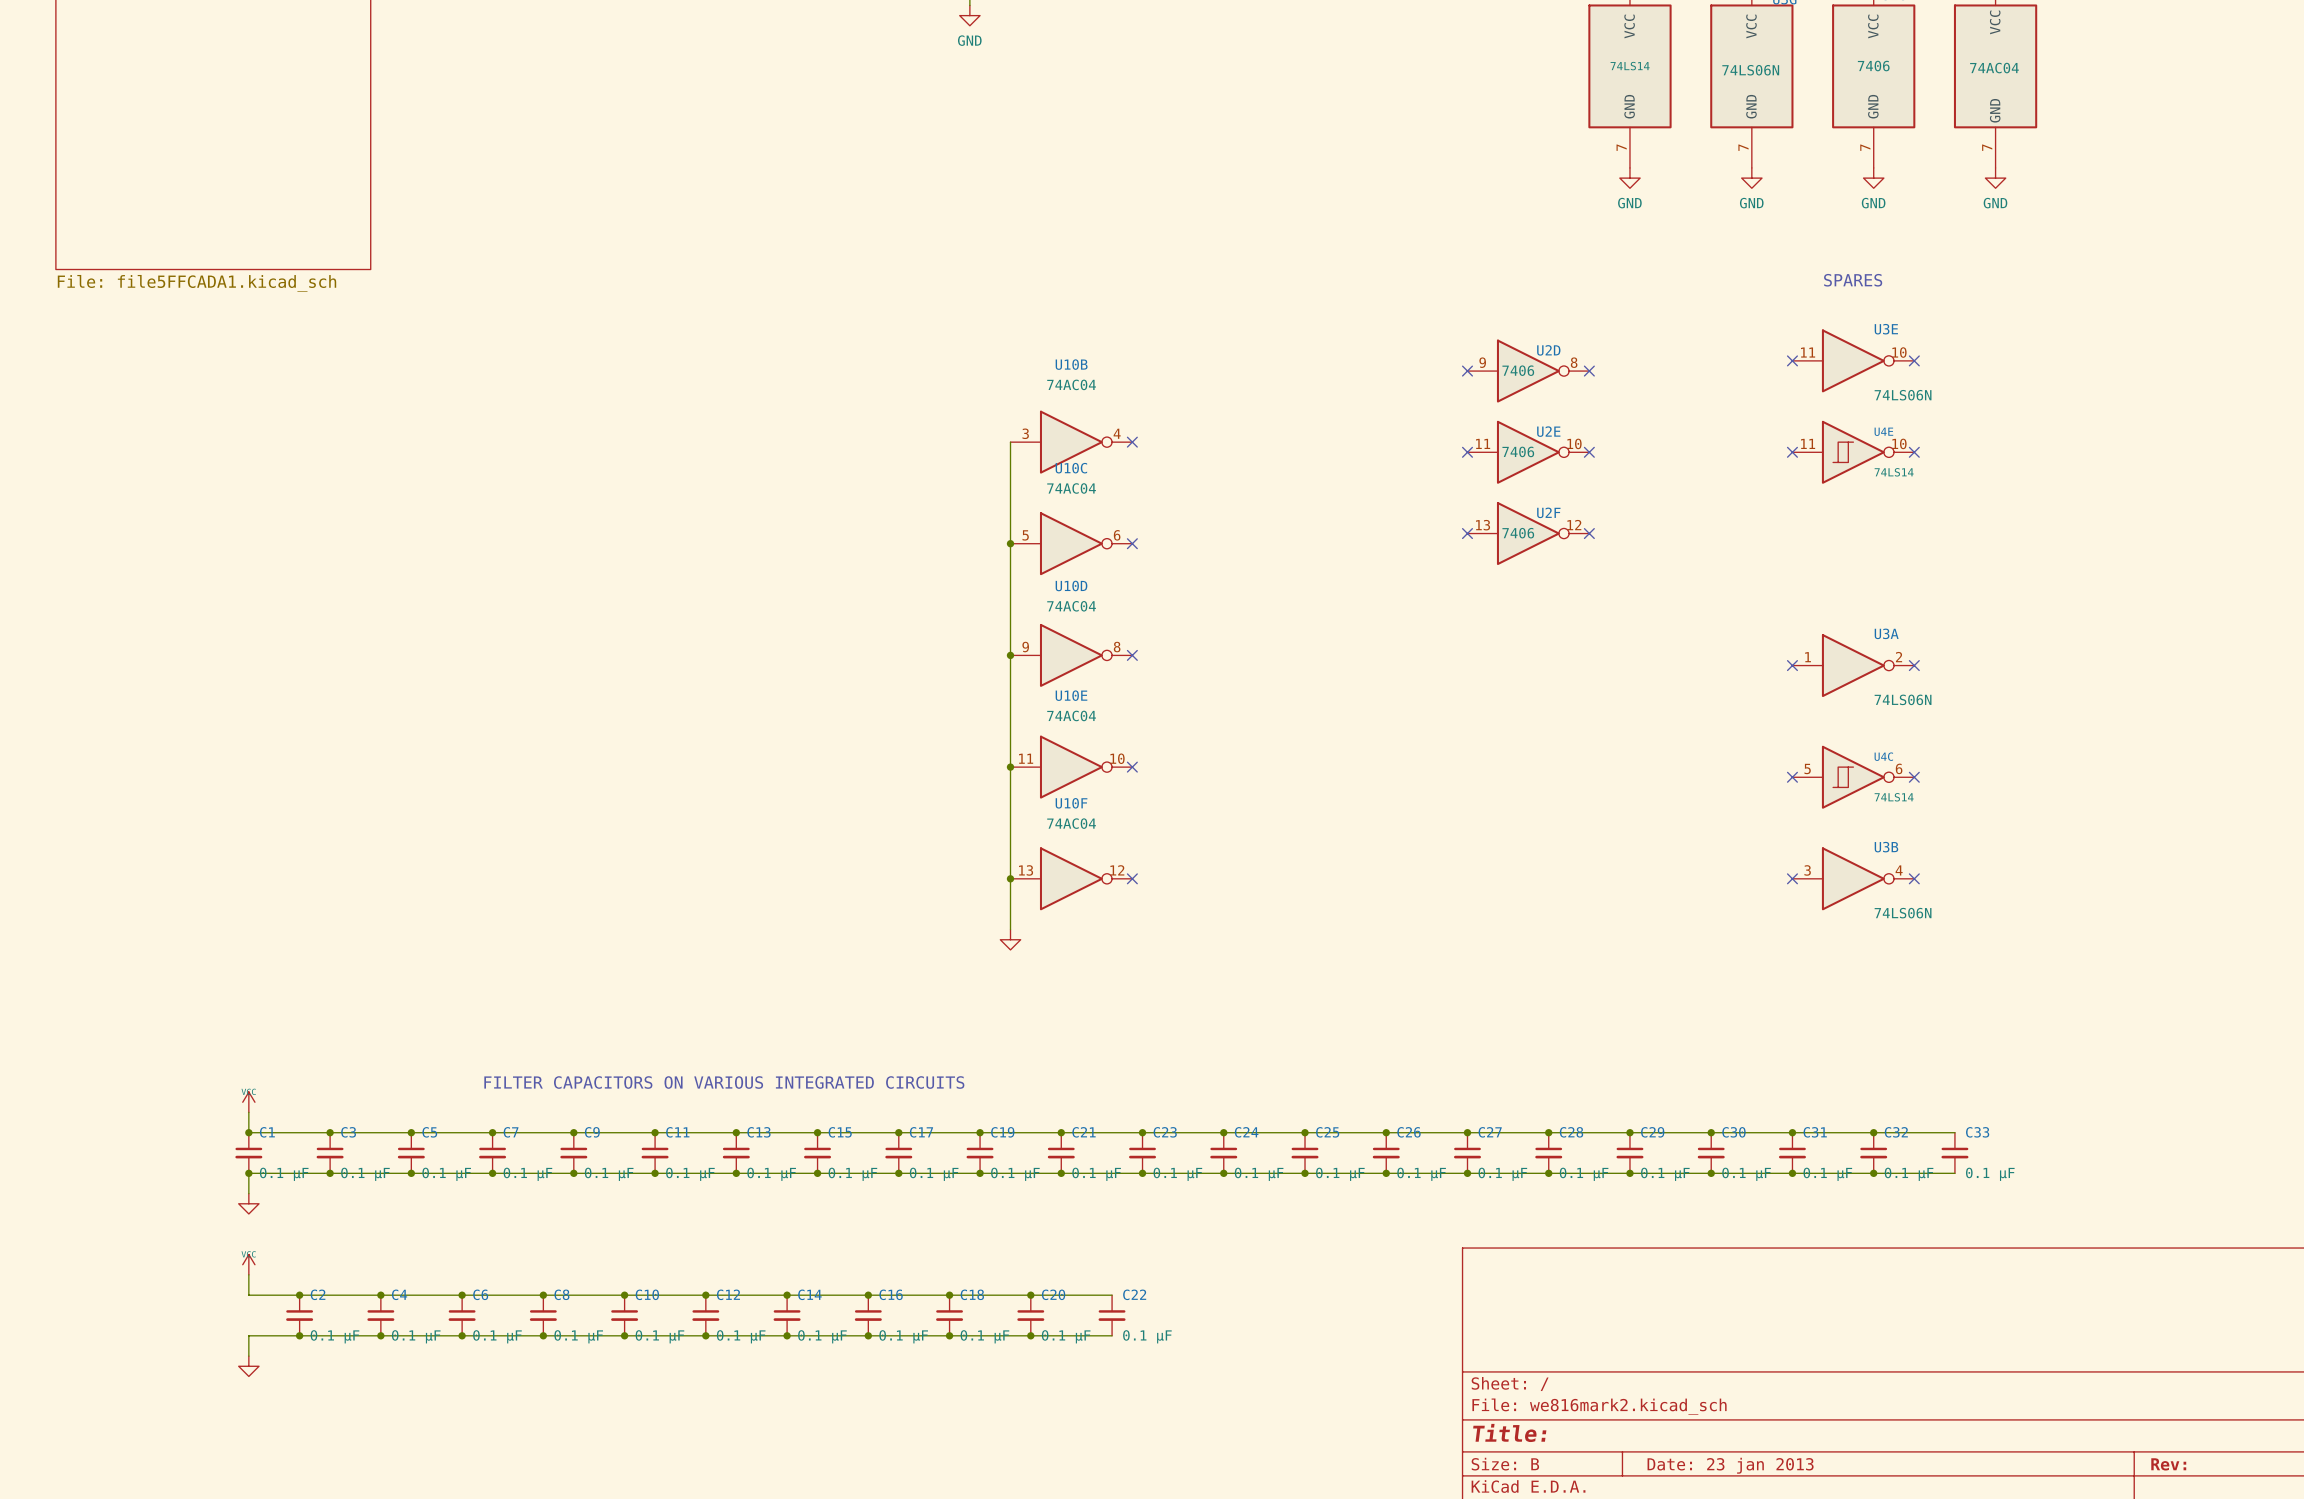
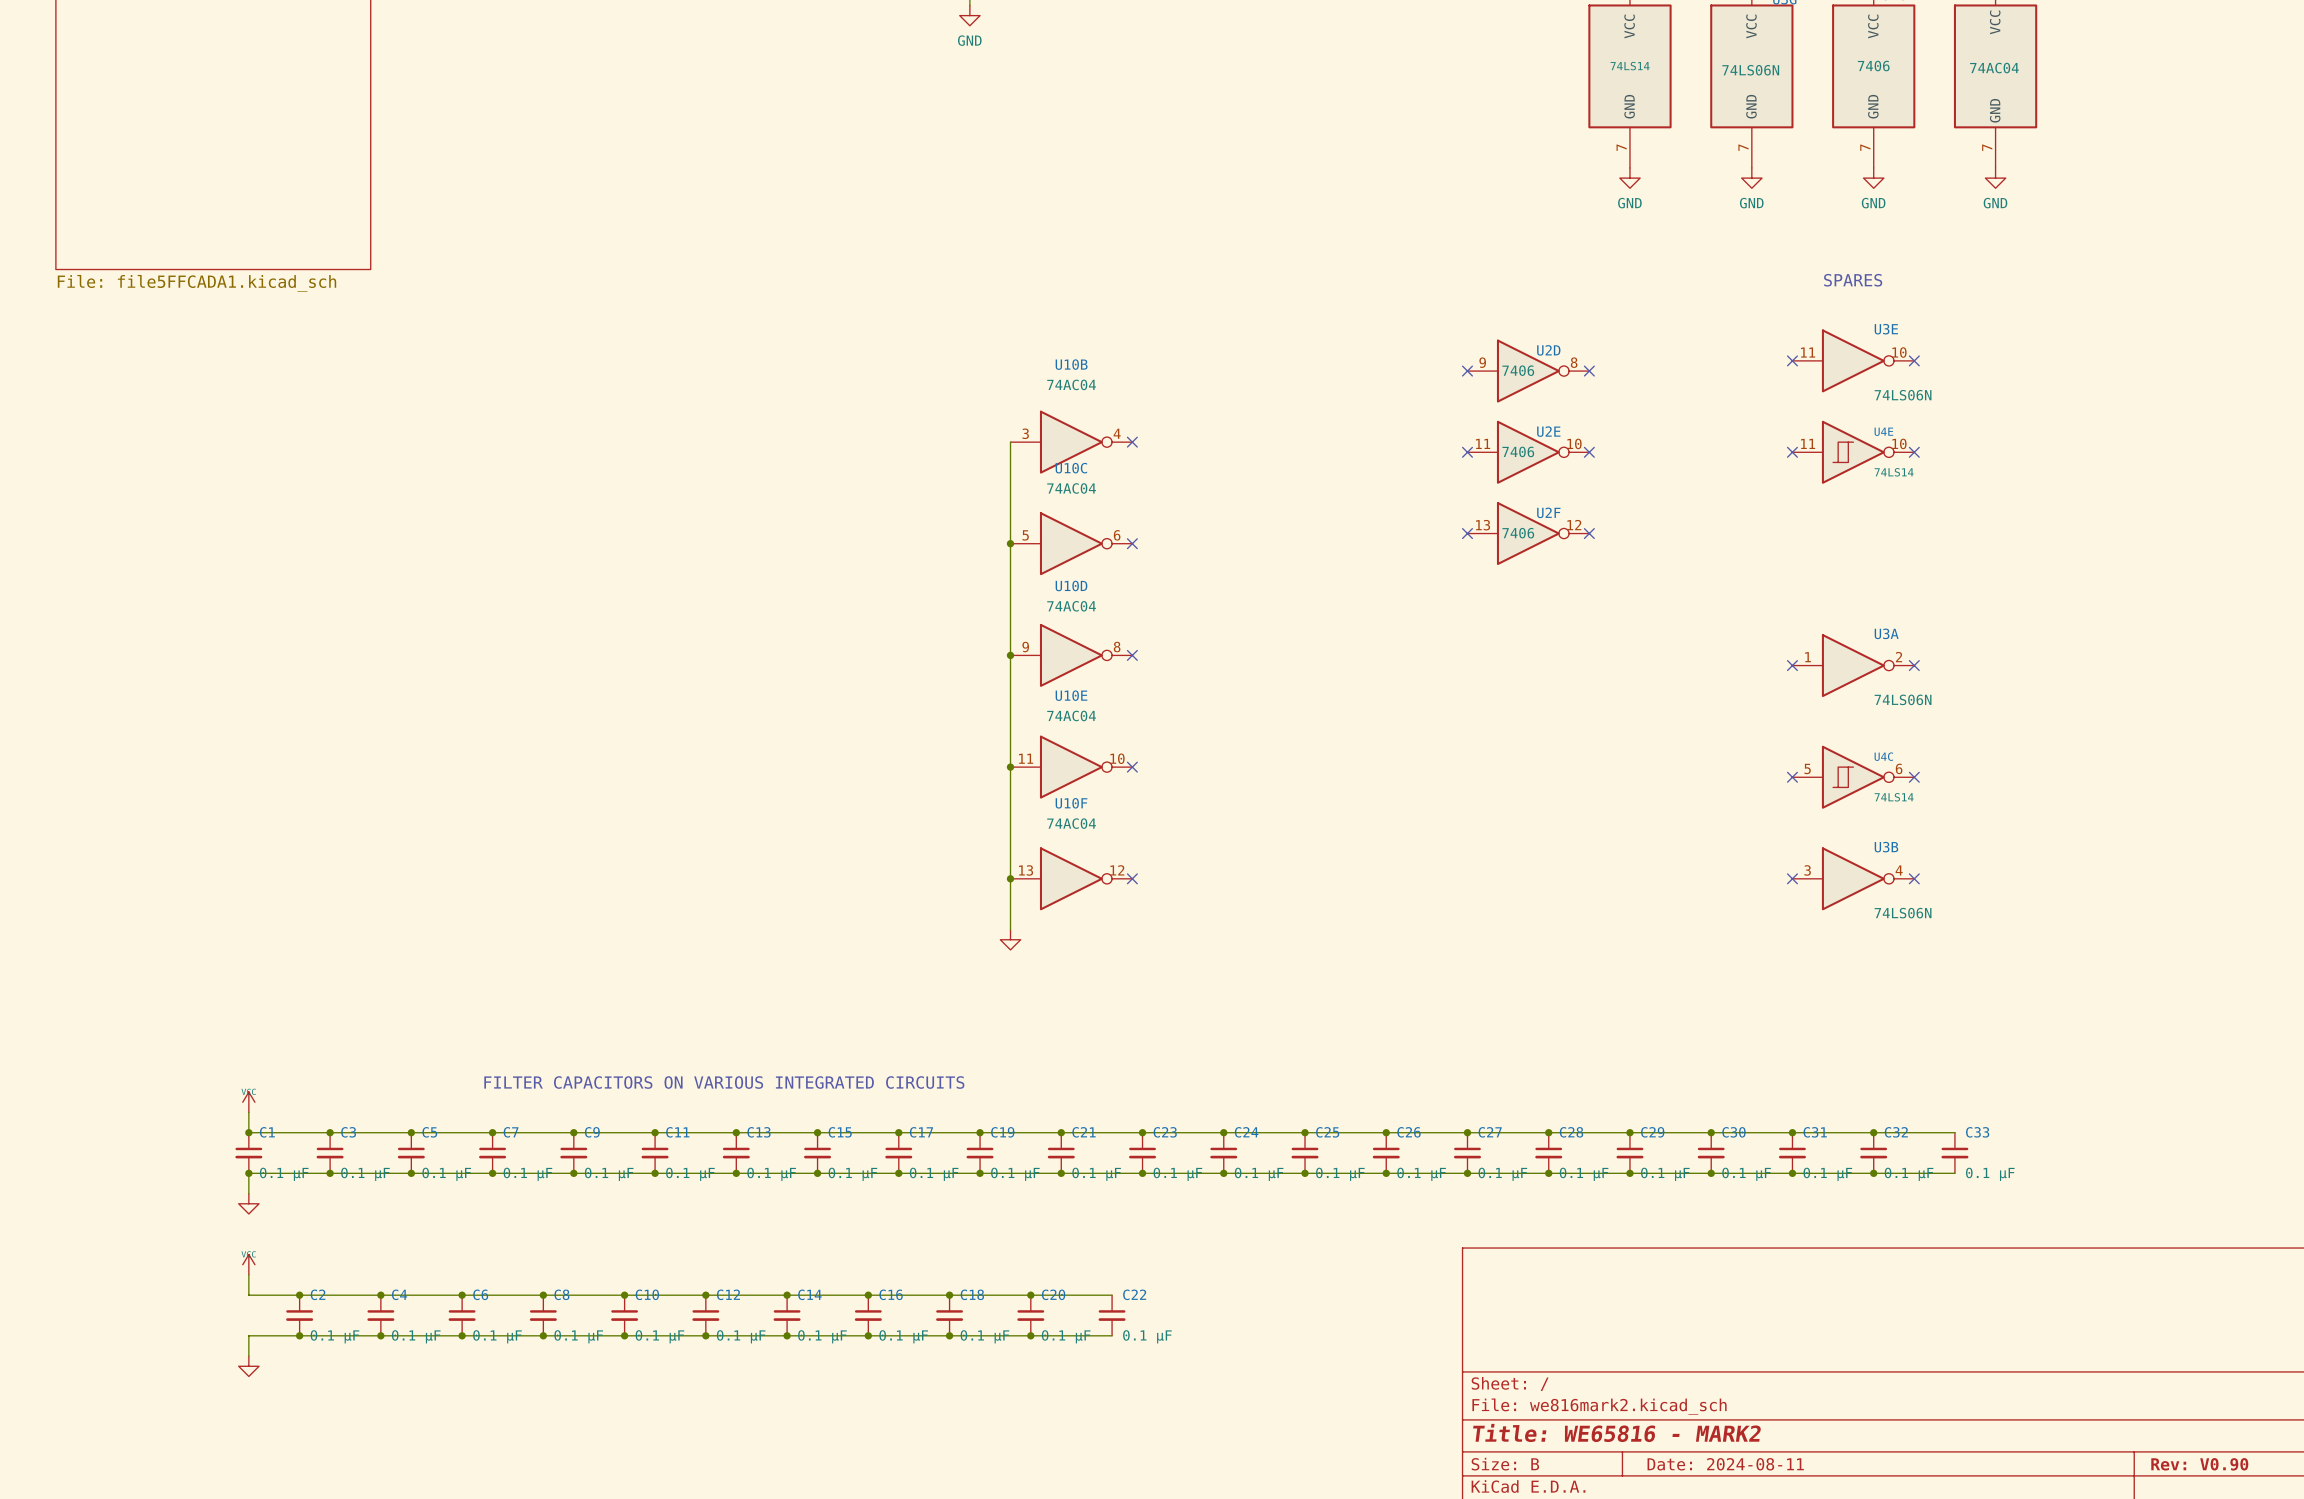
title block: Title: (1509, 1432) -> Title: WE65816 - MARK2 (1617, 1432)
title block: Rev: (2168, 1464) -> Rev: V0.90 (2199, 1464)
title block: Date: 23 jan 2013 (1730, 1465) -> Date: 2024-08-11 (1725, 1464)

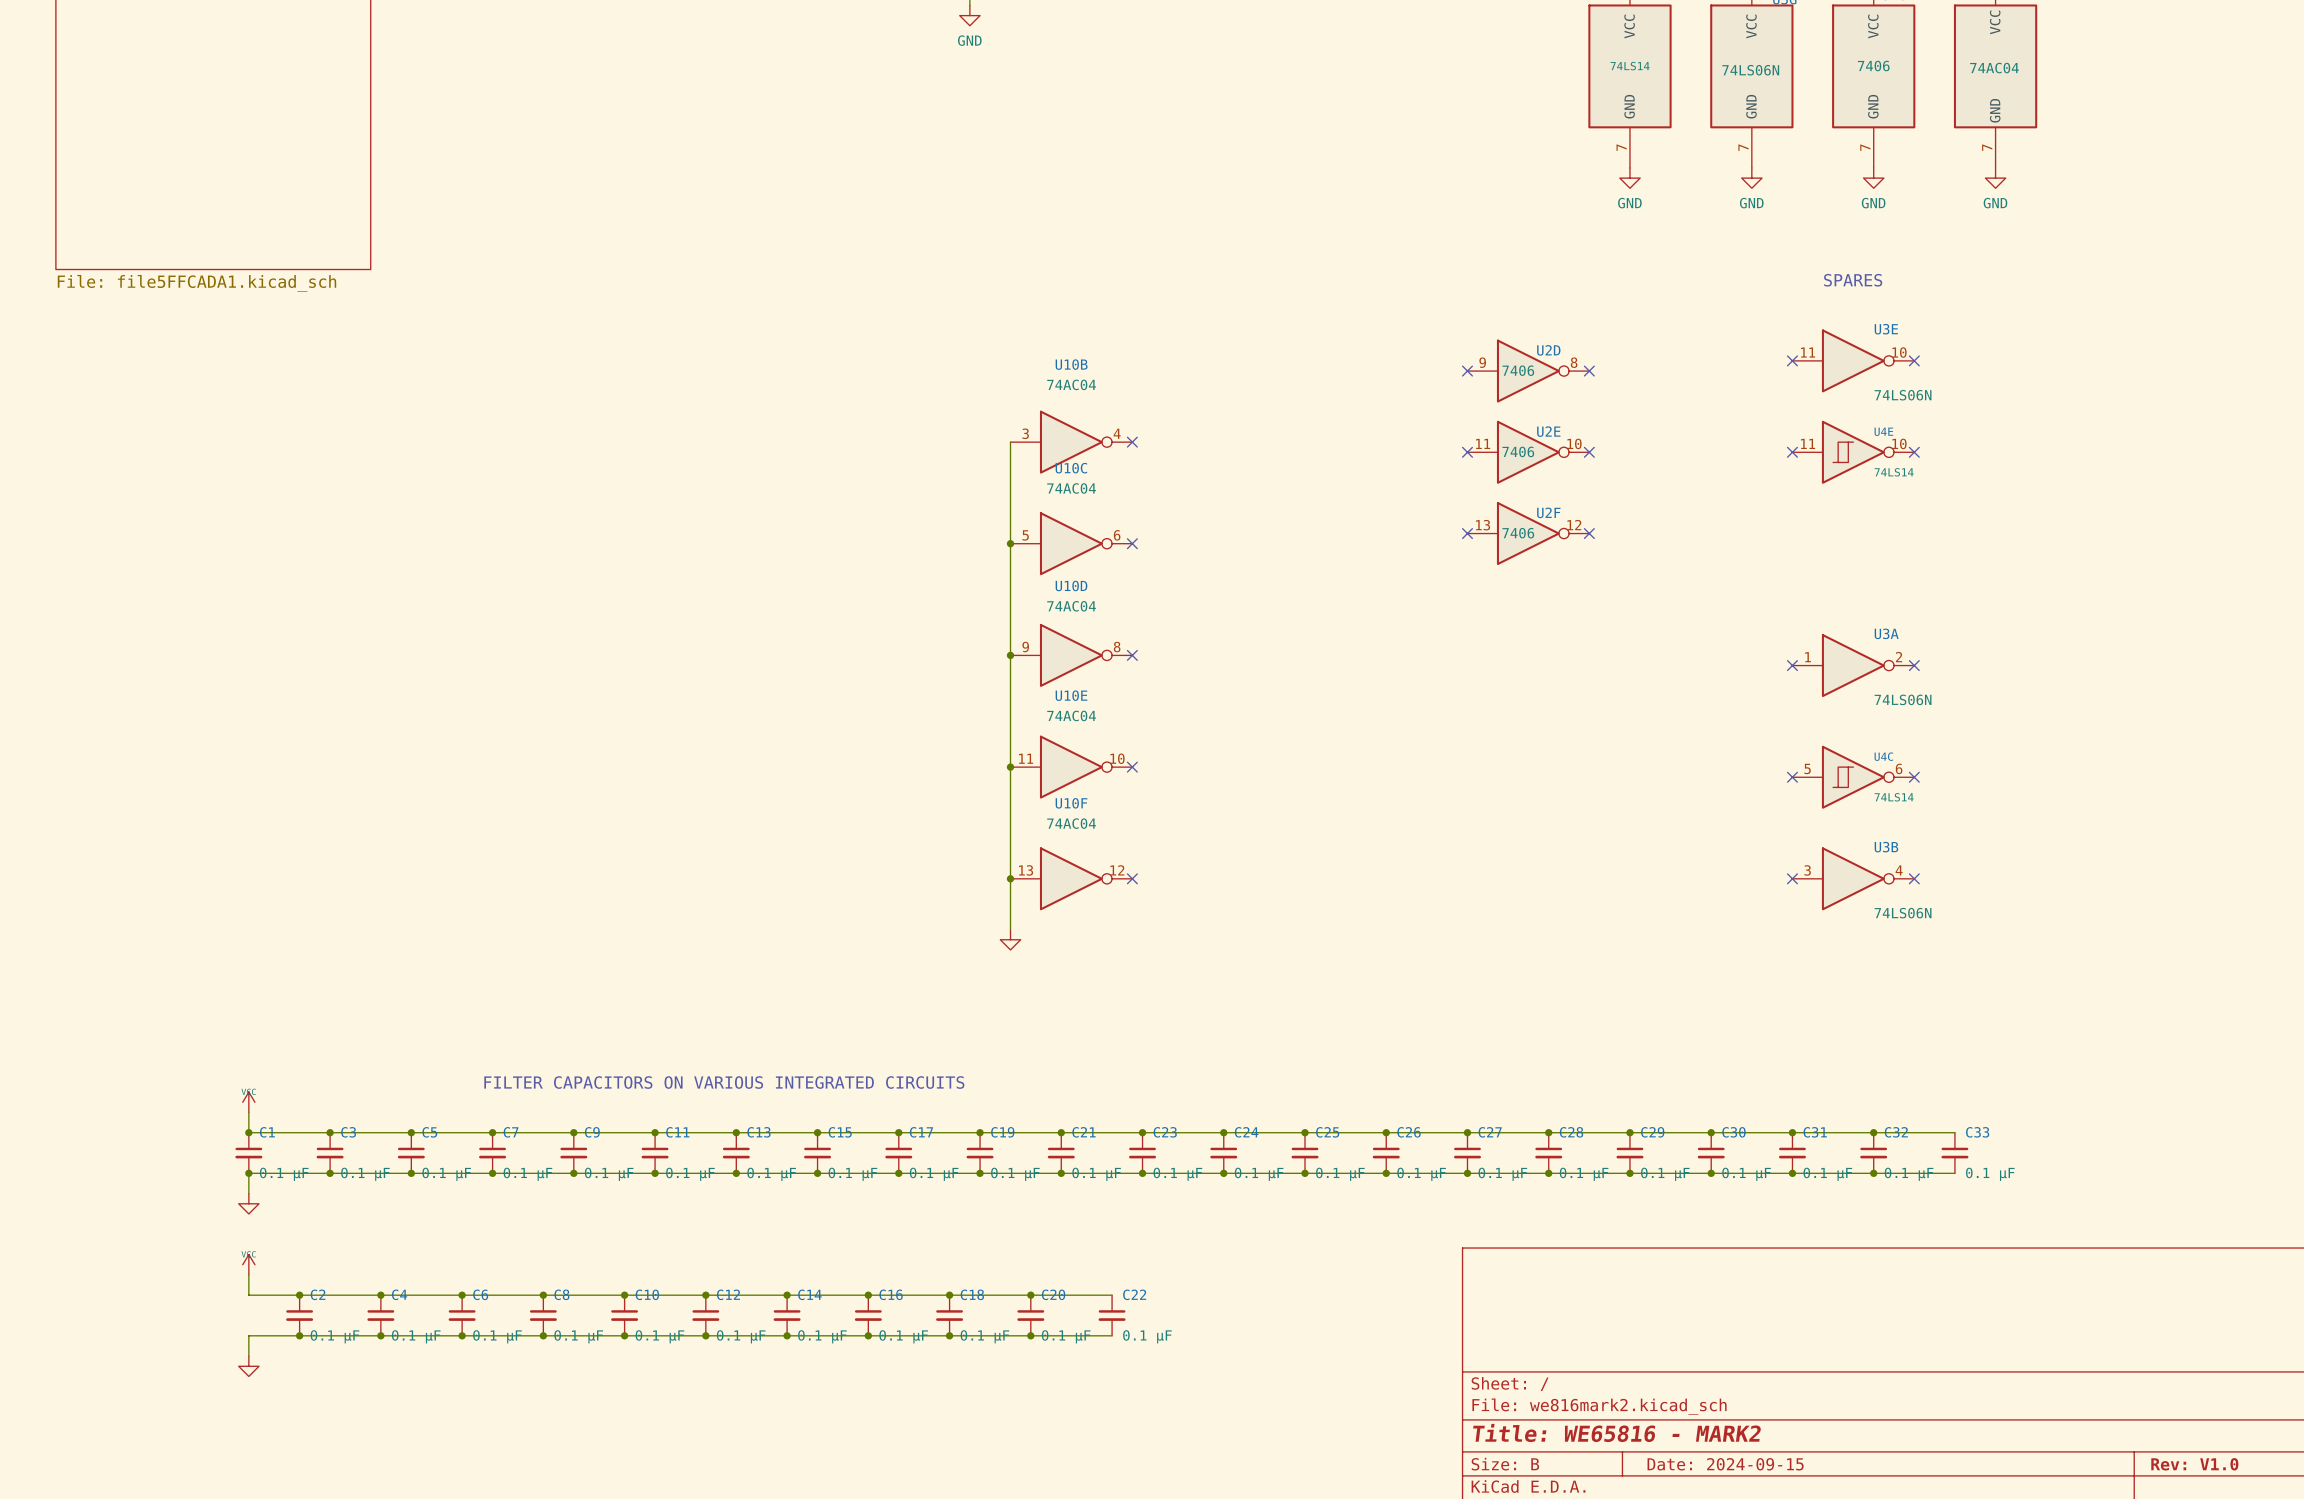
title block: Date: 2024-08-11 (1725, 1464) -> Date: 2024-09-15 (1725, 1464)
title block: Rev: V0.90 (2199, 1464) -> Rev: V1.0 (2194, 1464)

